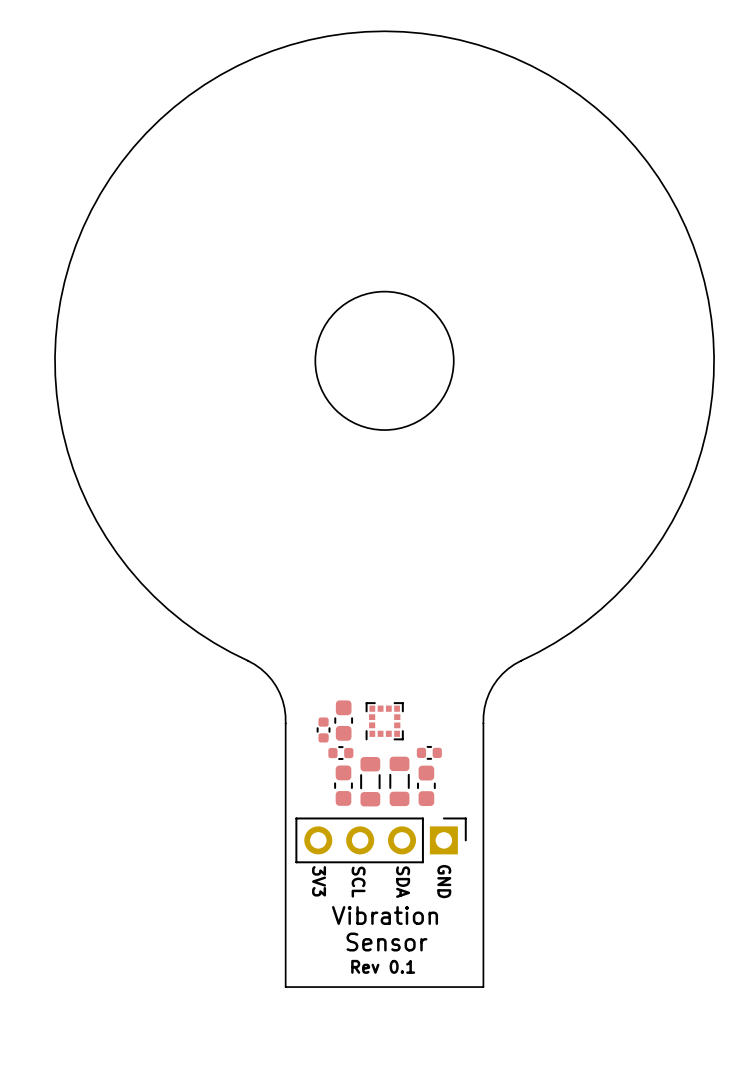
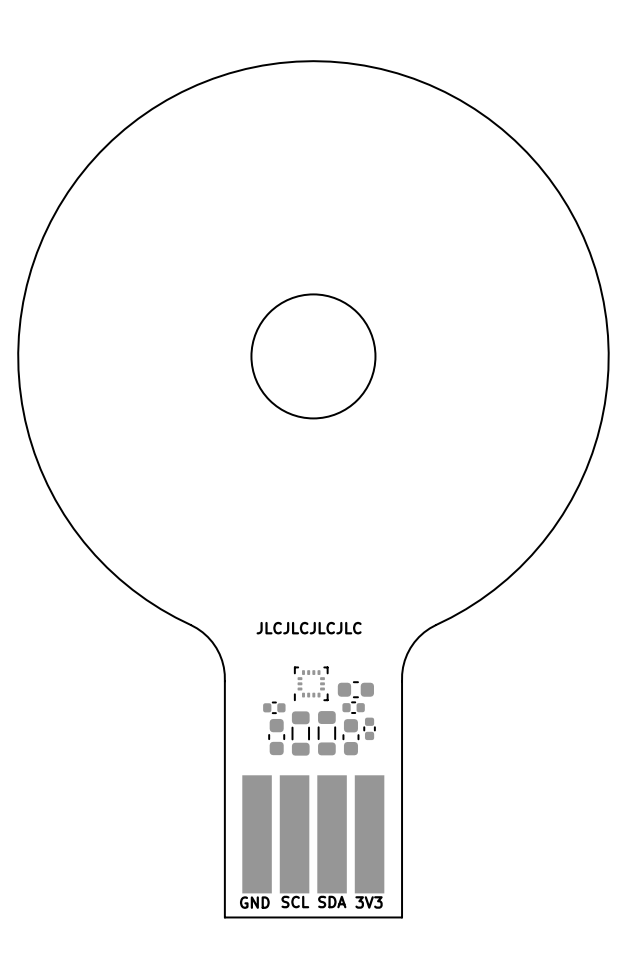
text: none -> JLCJLCJLCJLC (309, 628)
part footprint: [365, 702, 404, 741] -> [293, 666, 329, 702]
part rotation: 0° (343, 720) -> 90° clockwise (355, 689)
part position: (343, 720) -> (355, 689)
part position: (323, 729) -> (369, 728)
part: (381, 840) -> none
text rotation: 0° (319, 881) -> 90° counterclockwise (369, 902)
text position: 3V3 (319, 881) -> 3V3 (369, 902)
text rotation: 0° (444, 881) -> 90° counterclockwise (254, 902)
text position: GND (444, 881) -> GND (254, 902)
text rotation: 0° (358, 882) -> 90° counterclockwise (295, 902)
text position: SCL (358, 882) -> SCL (295, 902)
text rotation: 0° (403, 882) -> 90° counterclockwise (332, 902)
text position: SDA (403, 882) -> SDA (332, 902)
part: none -> (313, 834)
text: Vibration (385, 915) -> none
text: Sensor (386, 942) -> none
text: Rev 0.1 (383, 966) -> none

